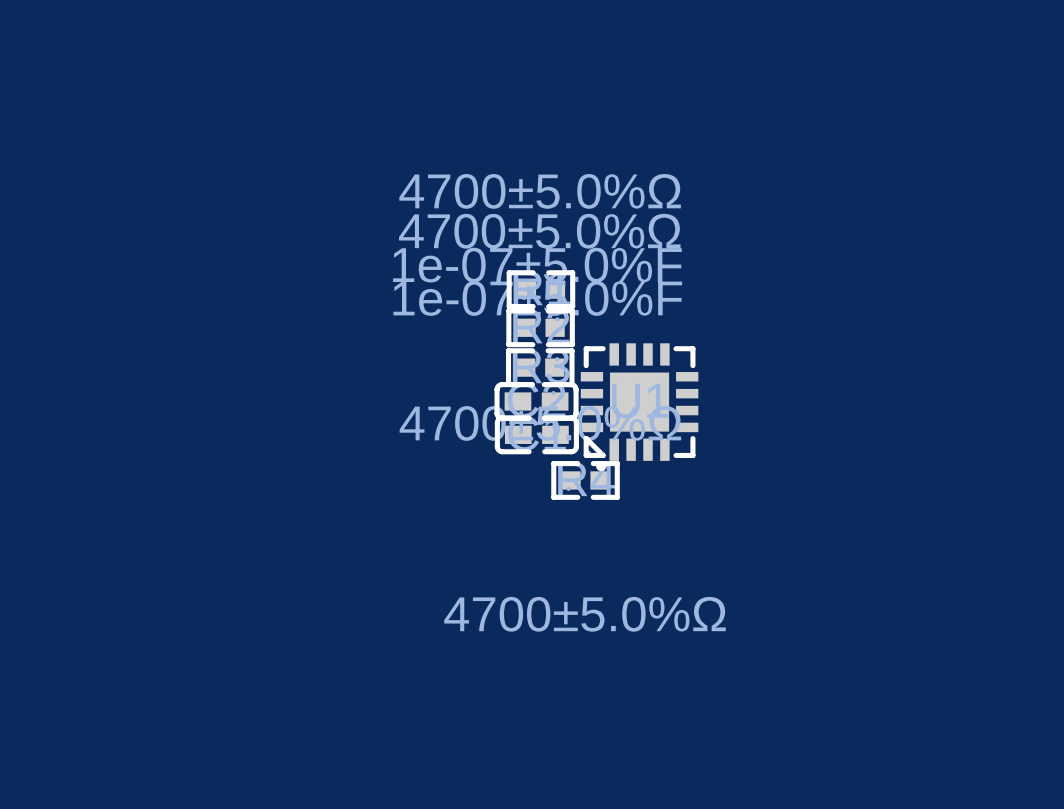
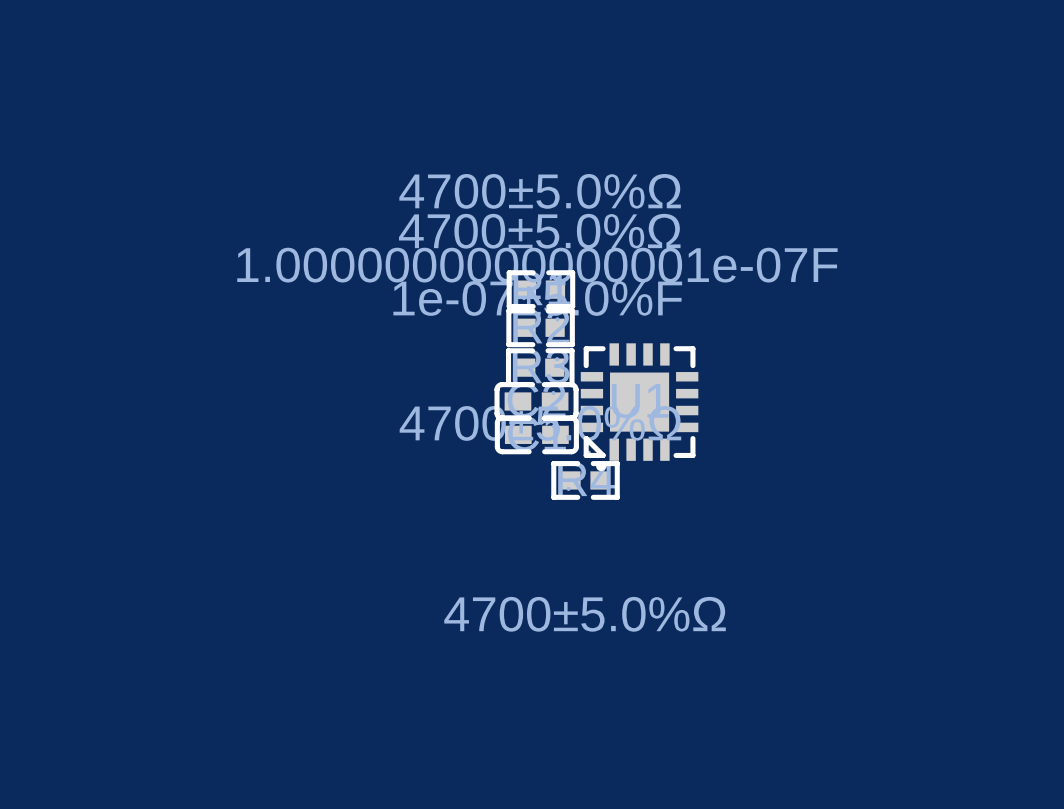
part value: 1e-07±5.0%F (537, 265) -> 1.0000000000000001e-07F (537, 265)

